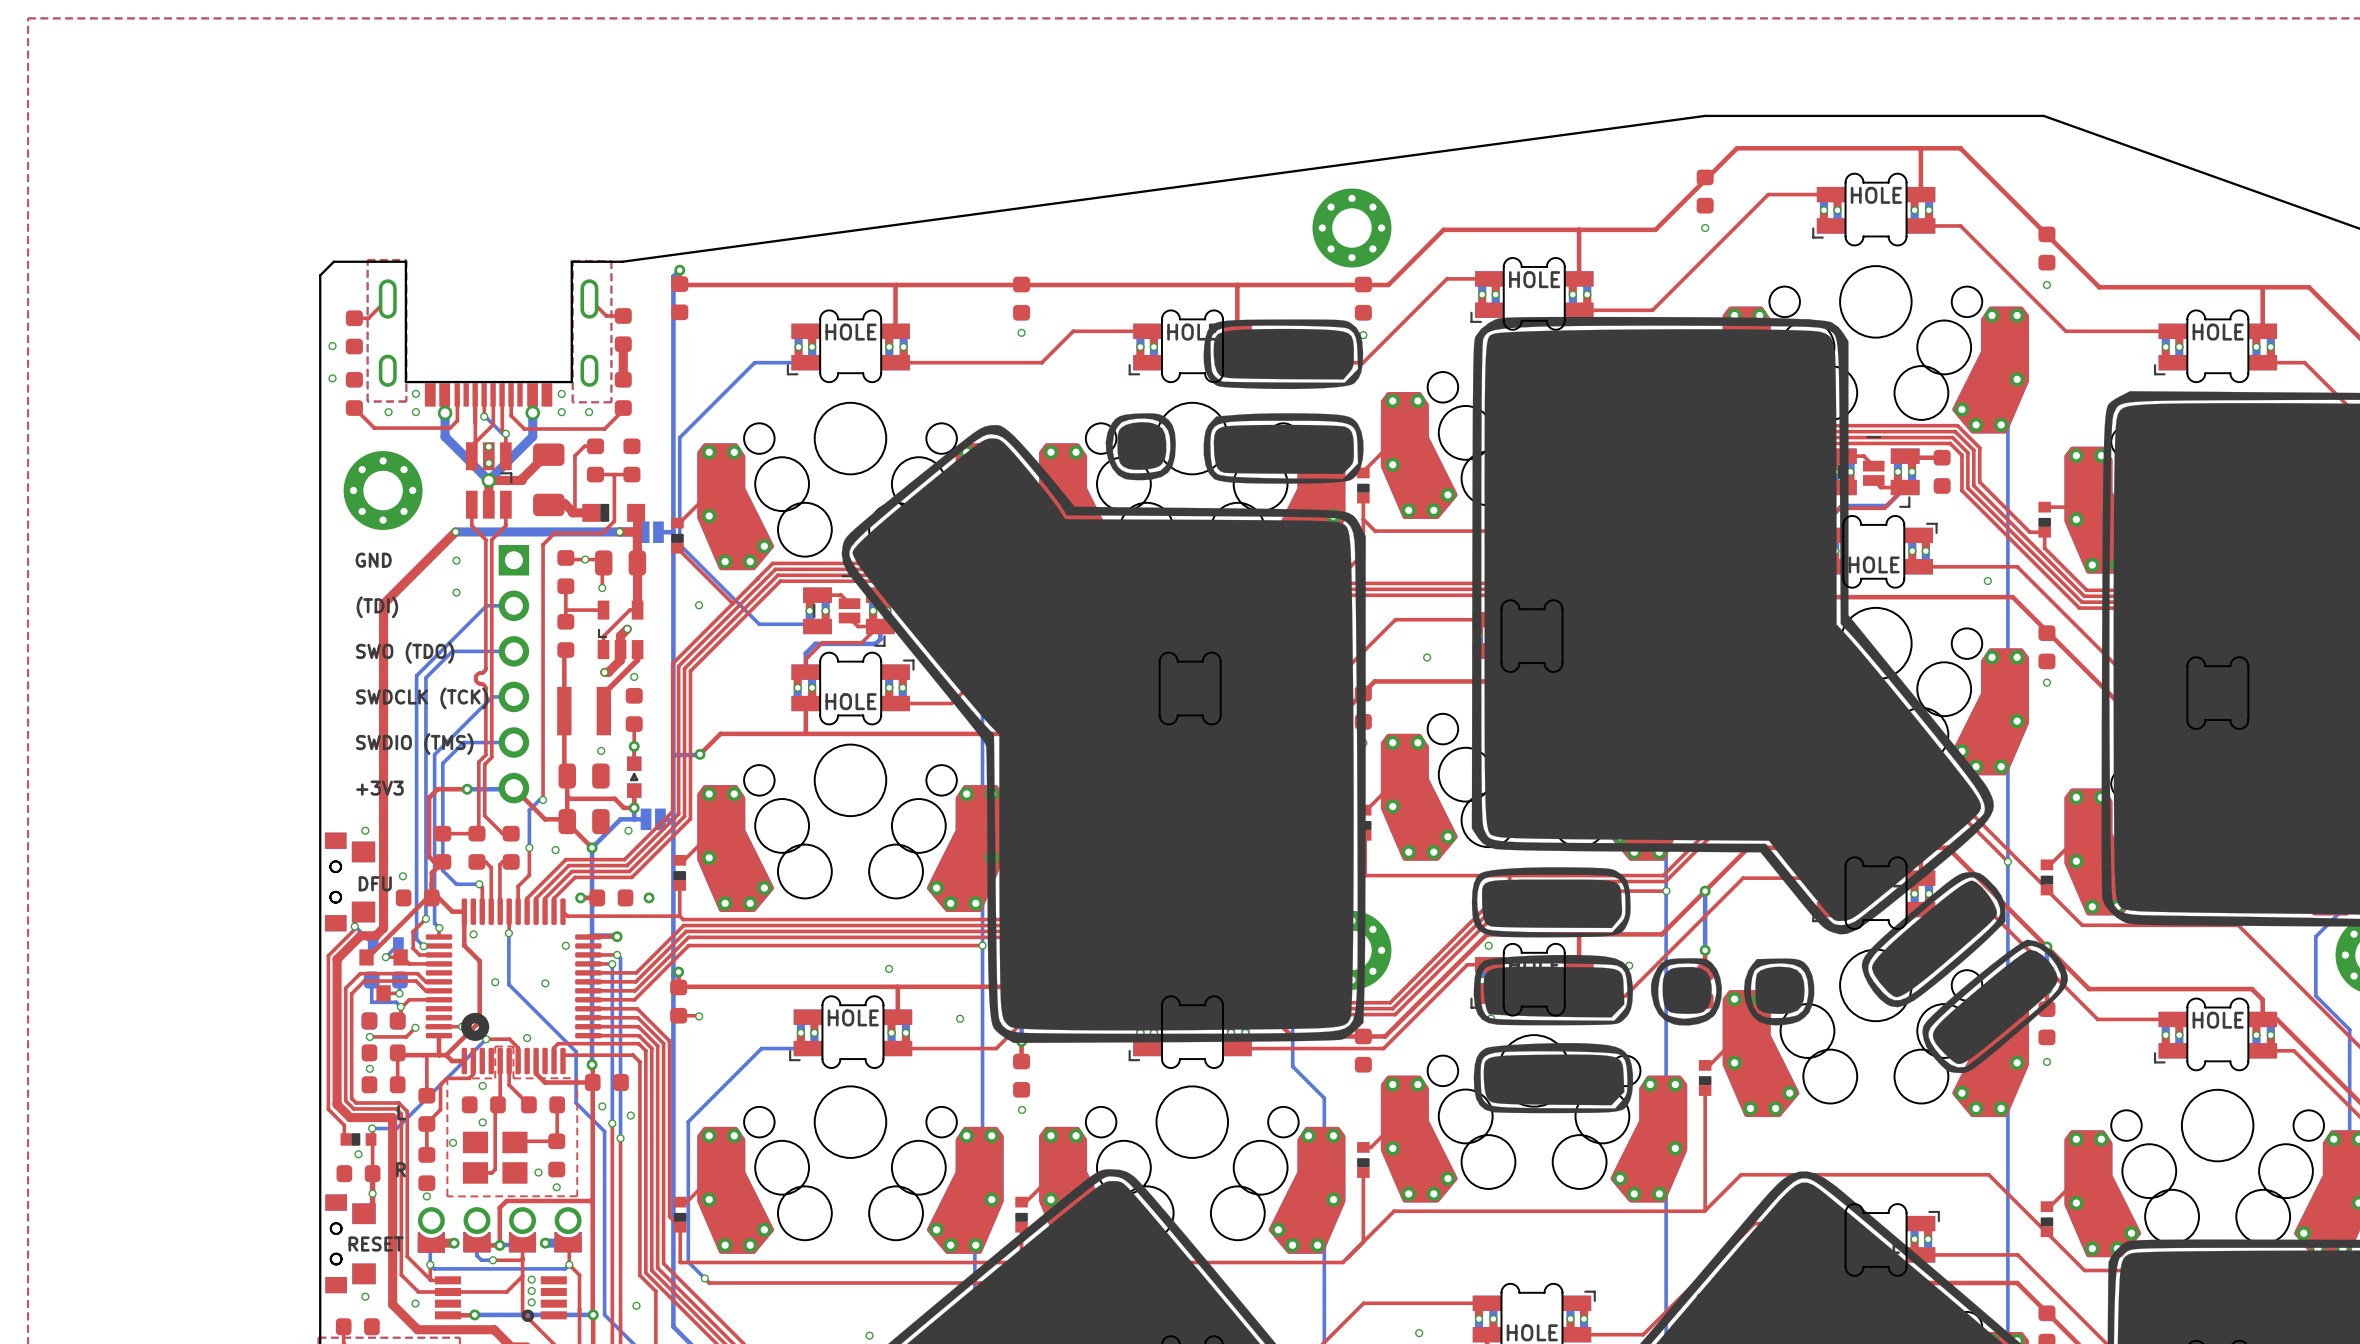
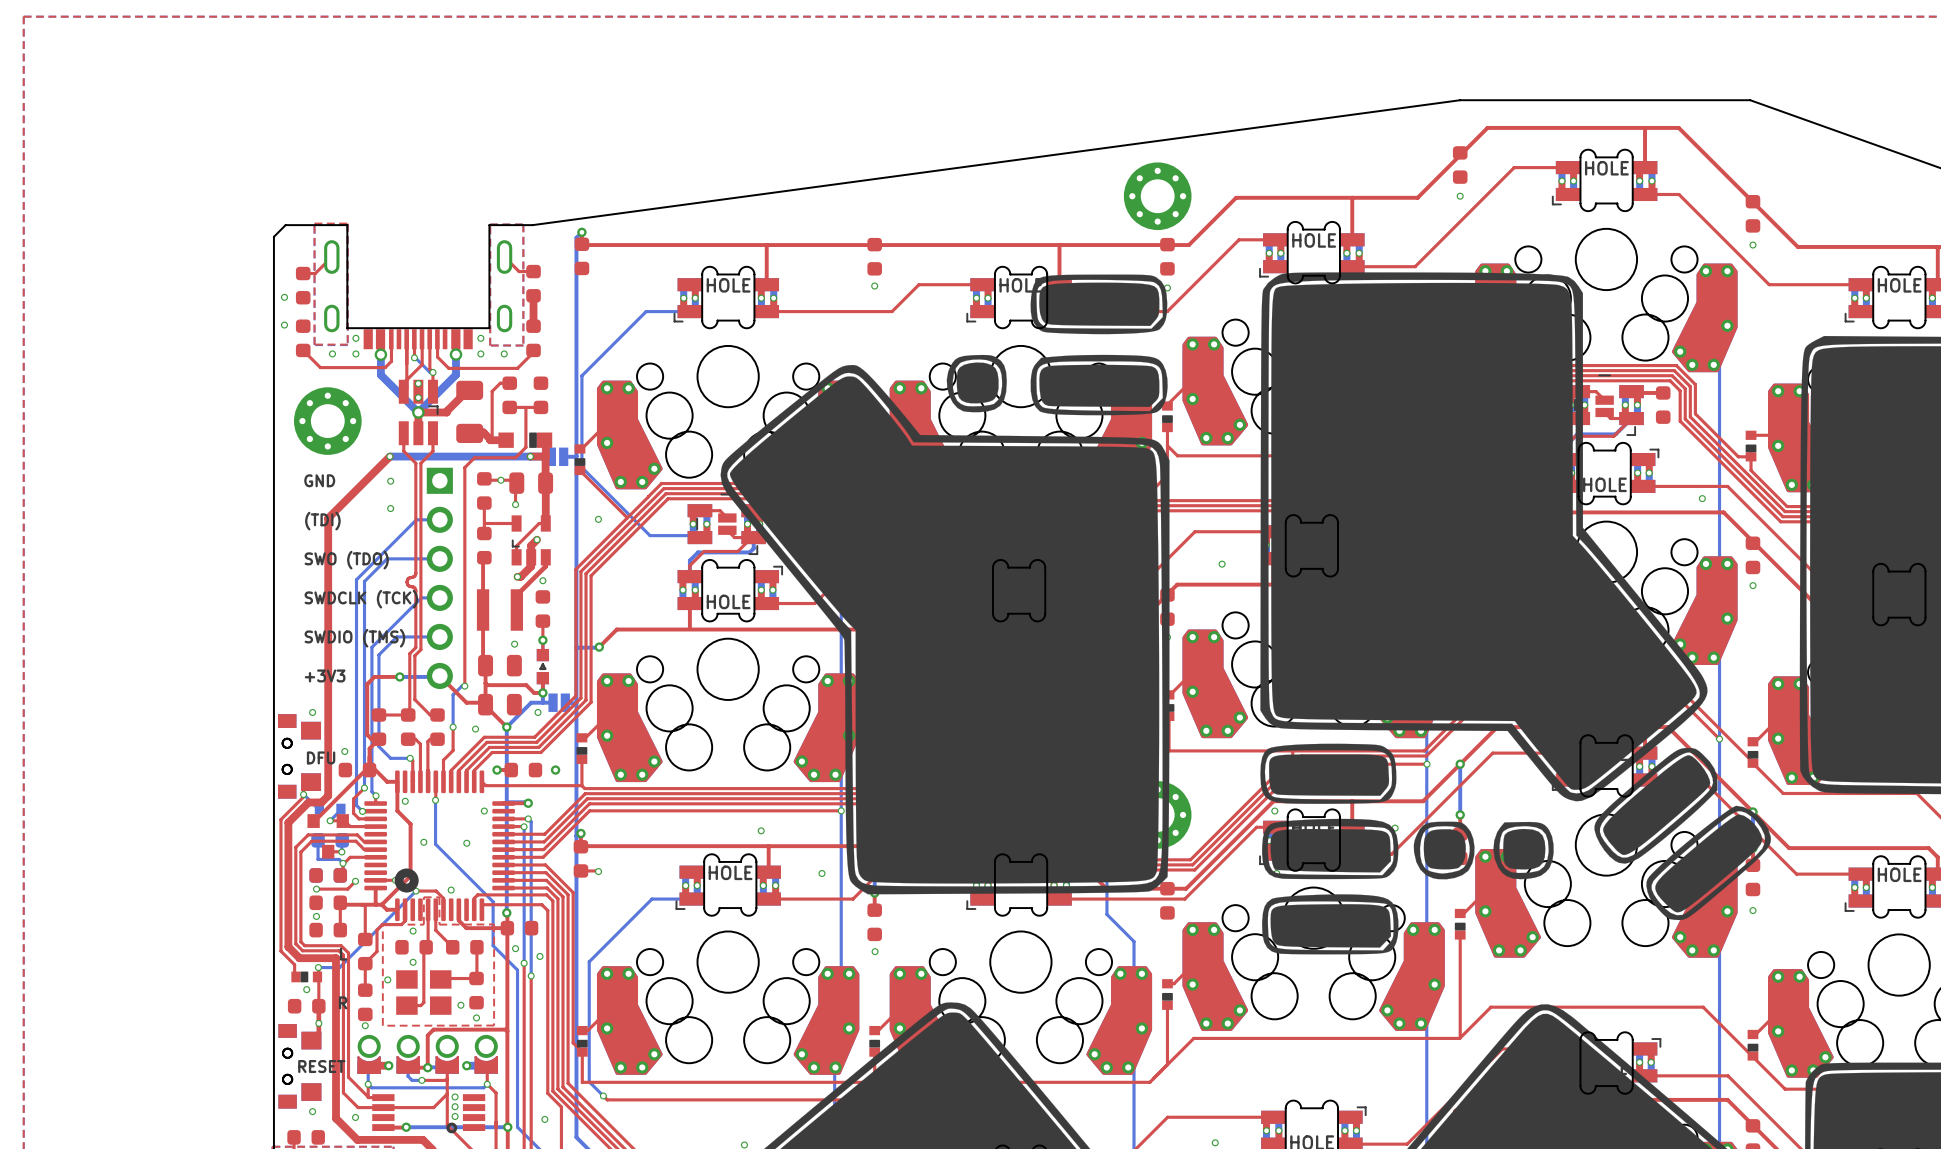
part rotation: 0° (613, 512) -> 180° (525, 440)

